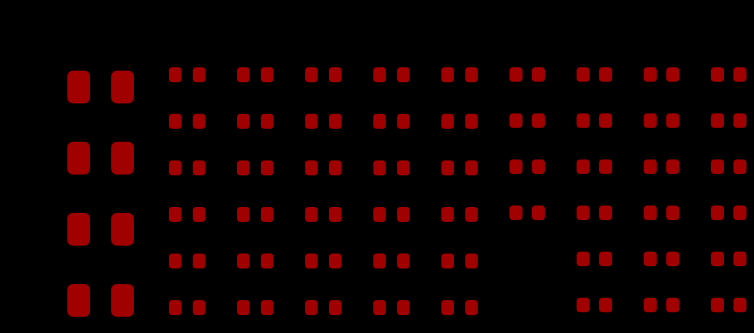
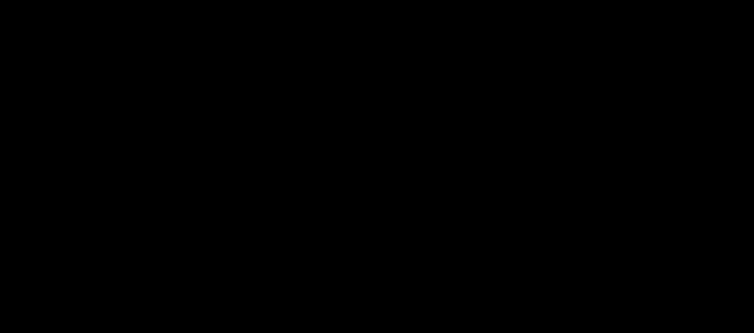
part: (187, 74) -> none
part: (255, 74) -> none
part: (323, 74) -> none
part: (391, 74) -> none
part: (459, 74) -> none
part: (527, 74) -> none
part: (594, 74) -> none
part: (661, 74) -> none
part: (728, 74) -> none
part: (100, 87) -> none
part: (527, 120) -> none
part: (594, 120) -> none
part: (661, 120) -> none
part: (728, 120) -> none
part: (187, 121) -> none
part: (255, 121) -> none
part: (323, 121) -> none
part: (391, 121) -> none
part: (459, 121) -> none
part: (100, 158) -> none
part: (527, 166) -> none
part: (594, 166) -> none
part: (661, 166) -> none
part: (728, 166) -> none
part: (187, 167) -> none
part: (255, 167) -> none
part: (323, 167) -> none
part: (391, 167) -> none
part: (459, 167) -> none
part: (527, 212) -> none
part: (594, 212) -> none
part: (661, 212) -> none
part: (728, 212) -> none
part: (187, 214) -> none
part: (255, 214) -> none
part: (323, 214) -> none
part: (391, 214) -> none
part: (459, 214) -> none
part: (100, 229) -> none
part: (594, 258) -> none
part: (661, 258) -> none
part: (728, 258) -> none
part: (187, 261) -> none
part: (255, 261) -> none
part: (323, 261) -> none
part: (391, 261) -> none
part: (459, 261) -> none
part: (100, 300) -> none
part: (594, 305) -> none
part: (661, 305) -> none
part: (728, 305) -> none
part: (187, 307) -> none
part: (255, 307) -> none
part: (323, 307) -> none
part: (391, 307) -> none
part: (459, 307) -> none

